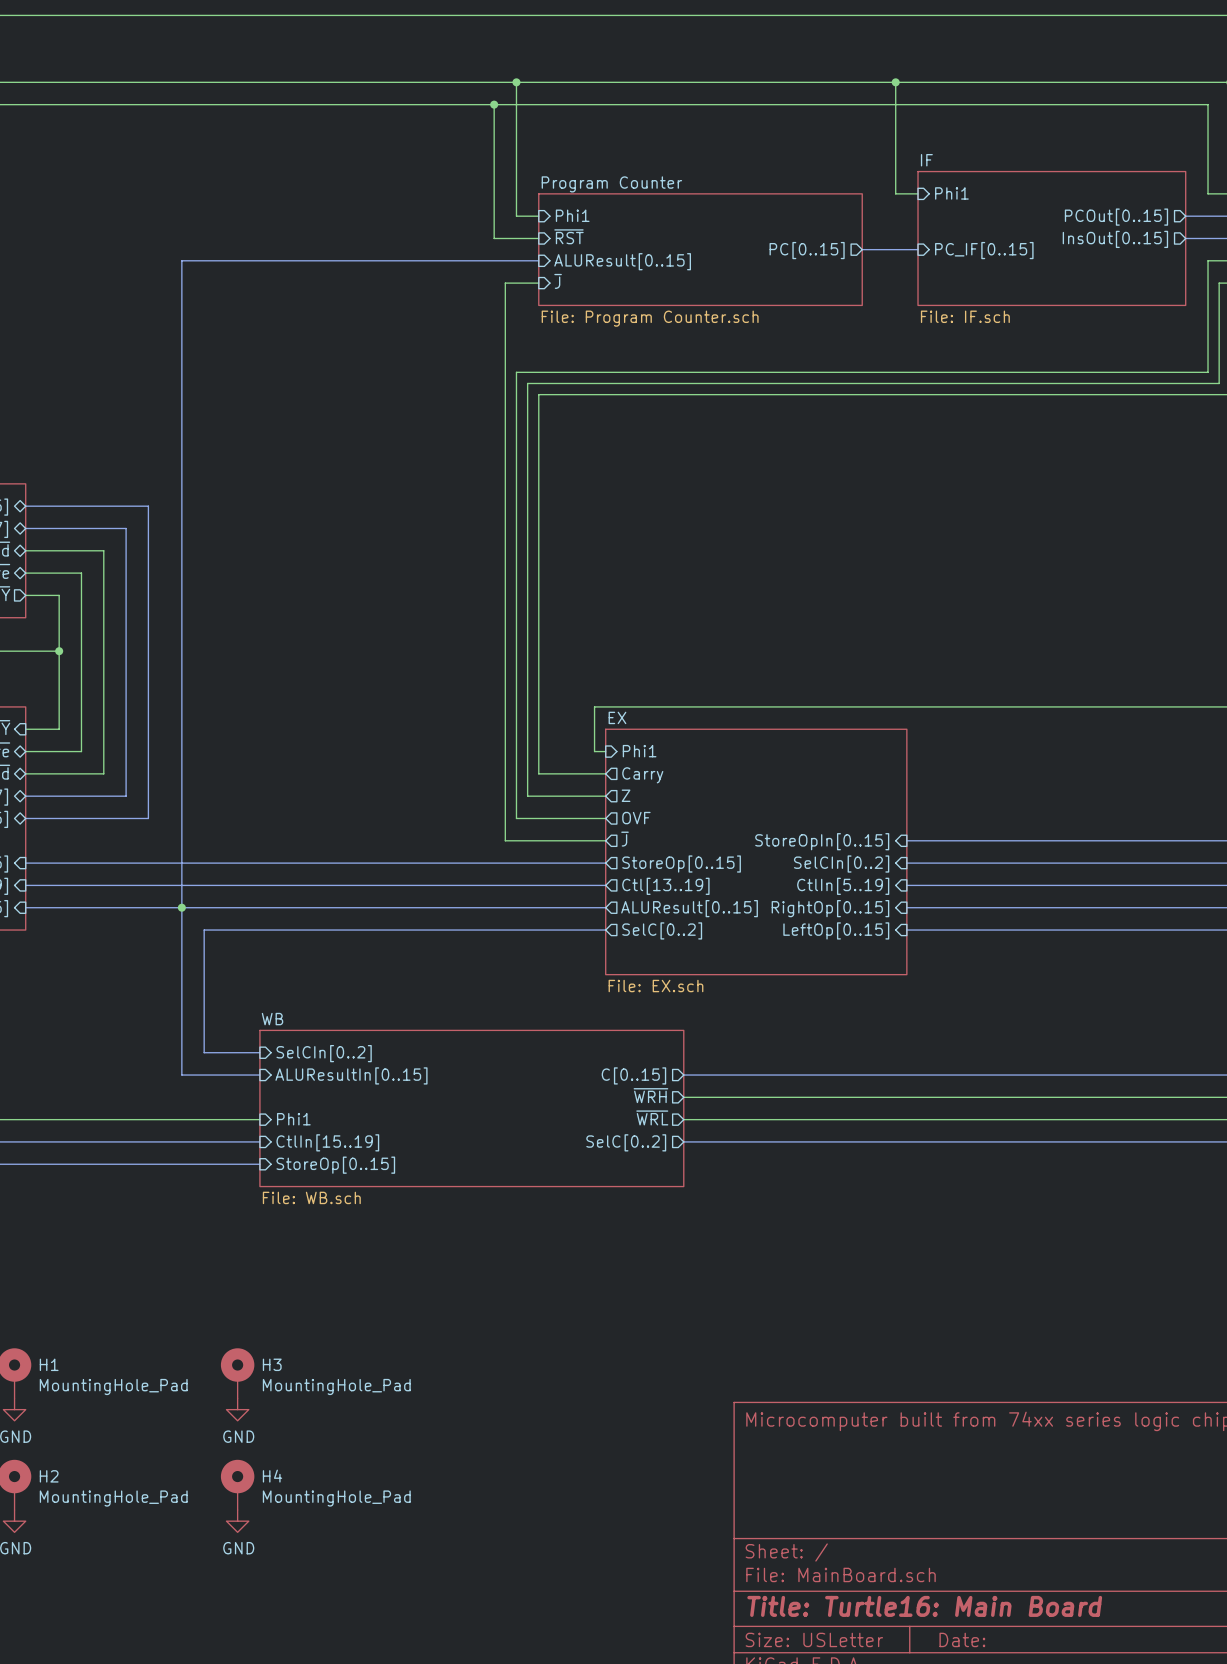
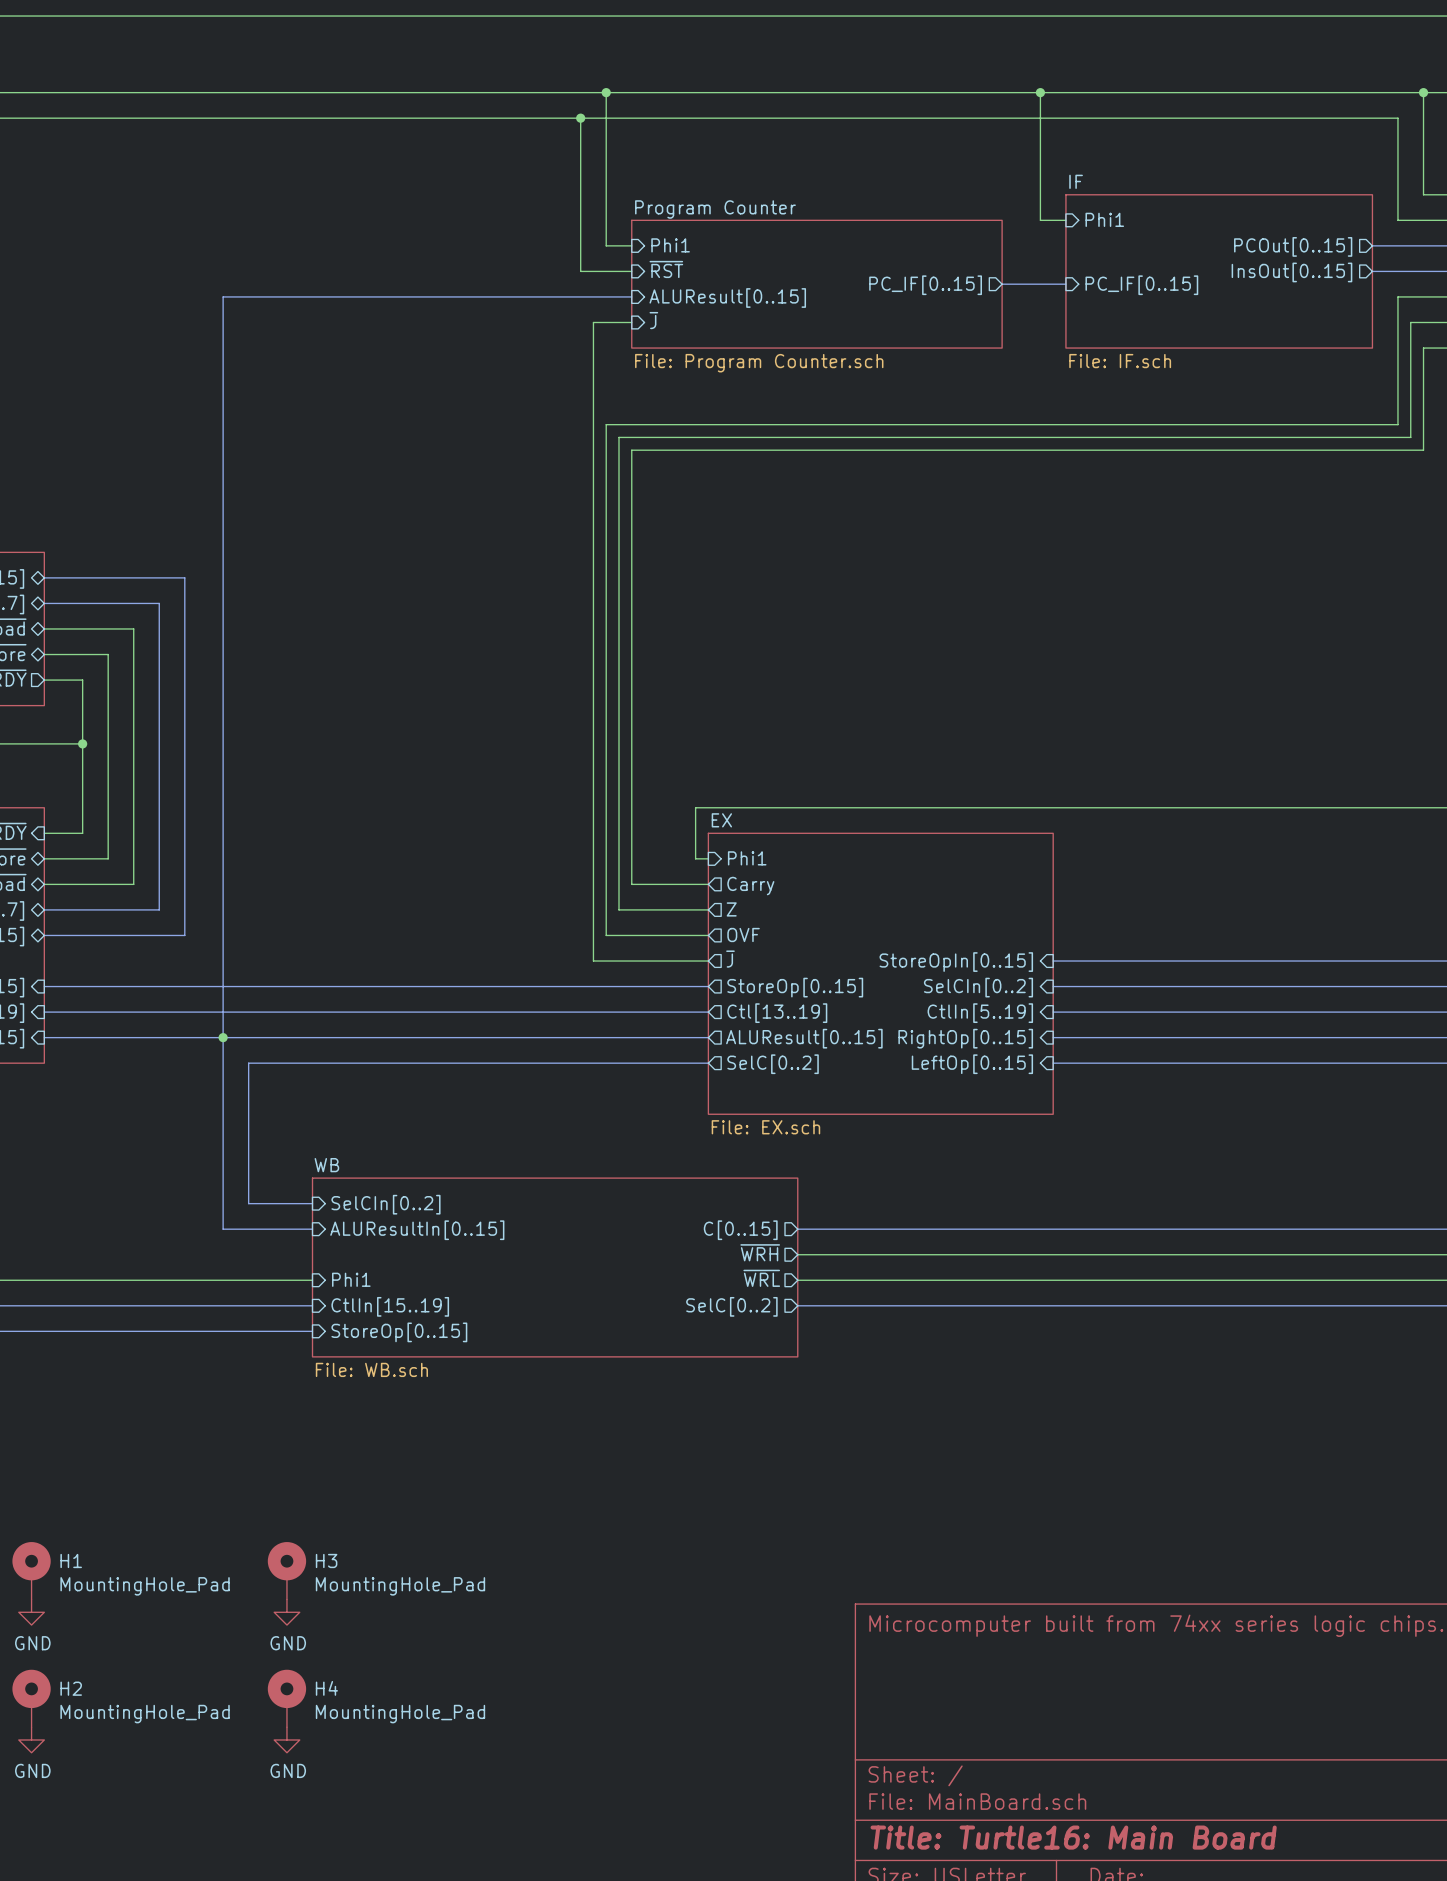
sheet pin: PC[0..15] (807, 250) -> PC_IF[0..15] (925, 285)

